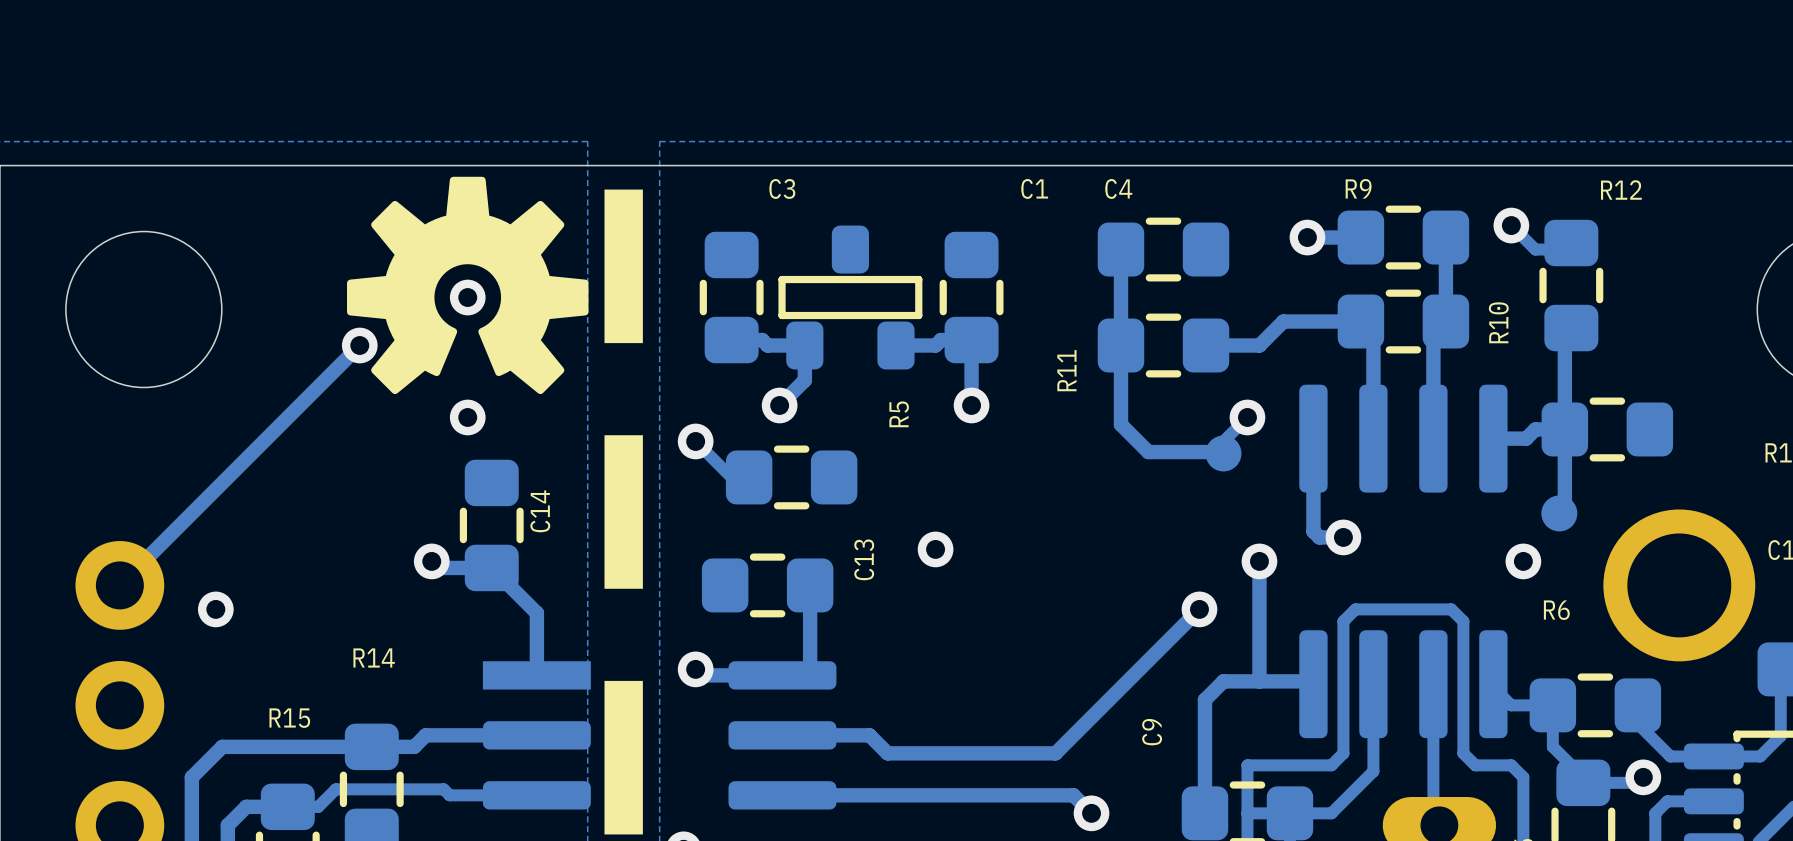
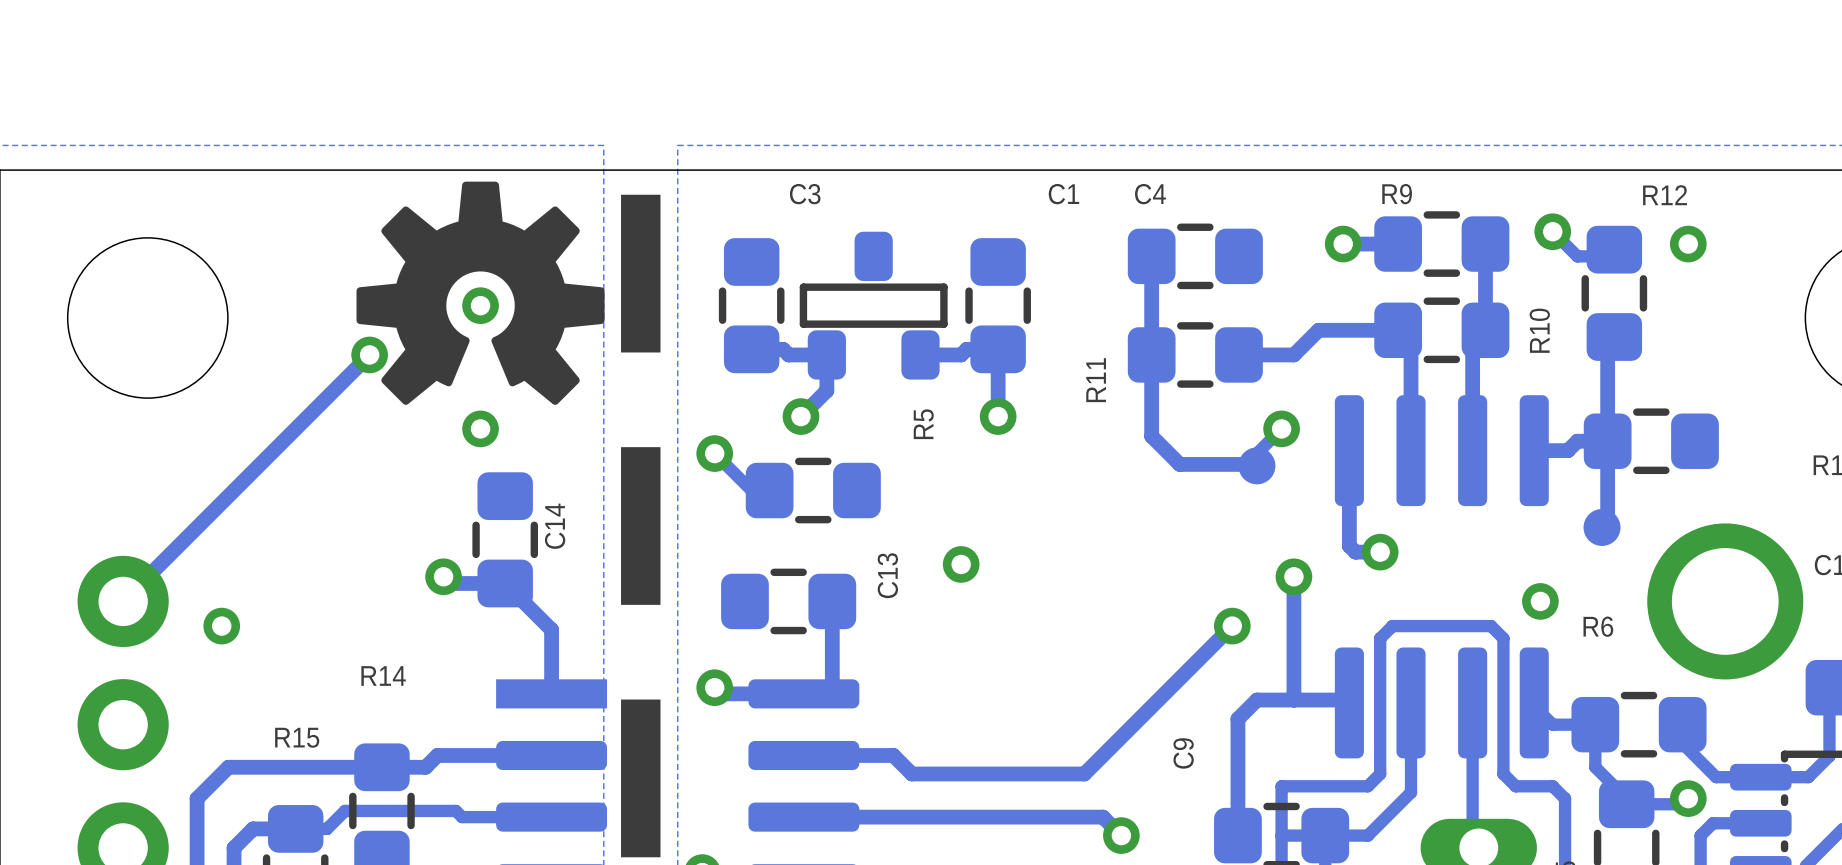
via: none -> (1688, 244)
via position: (1523, 561) -> (1540, 601)

